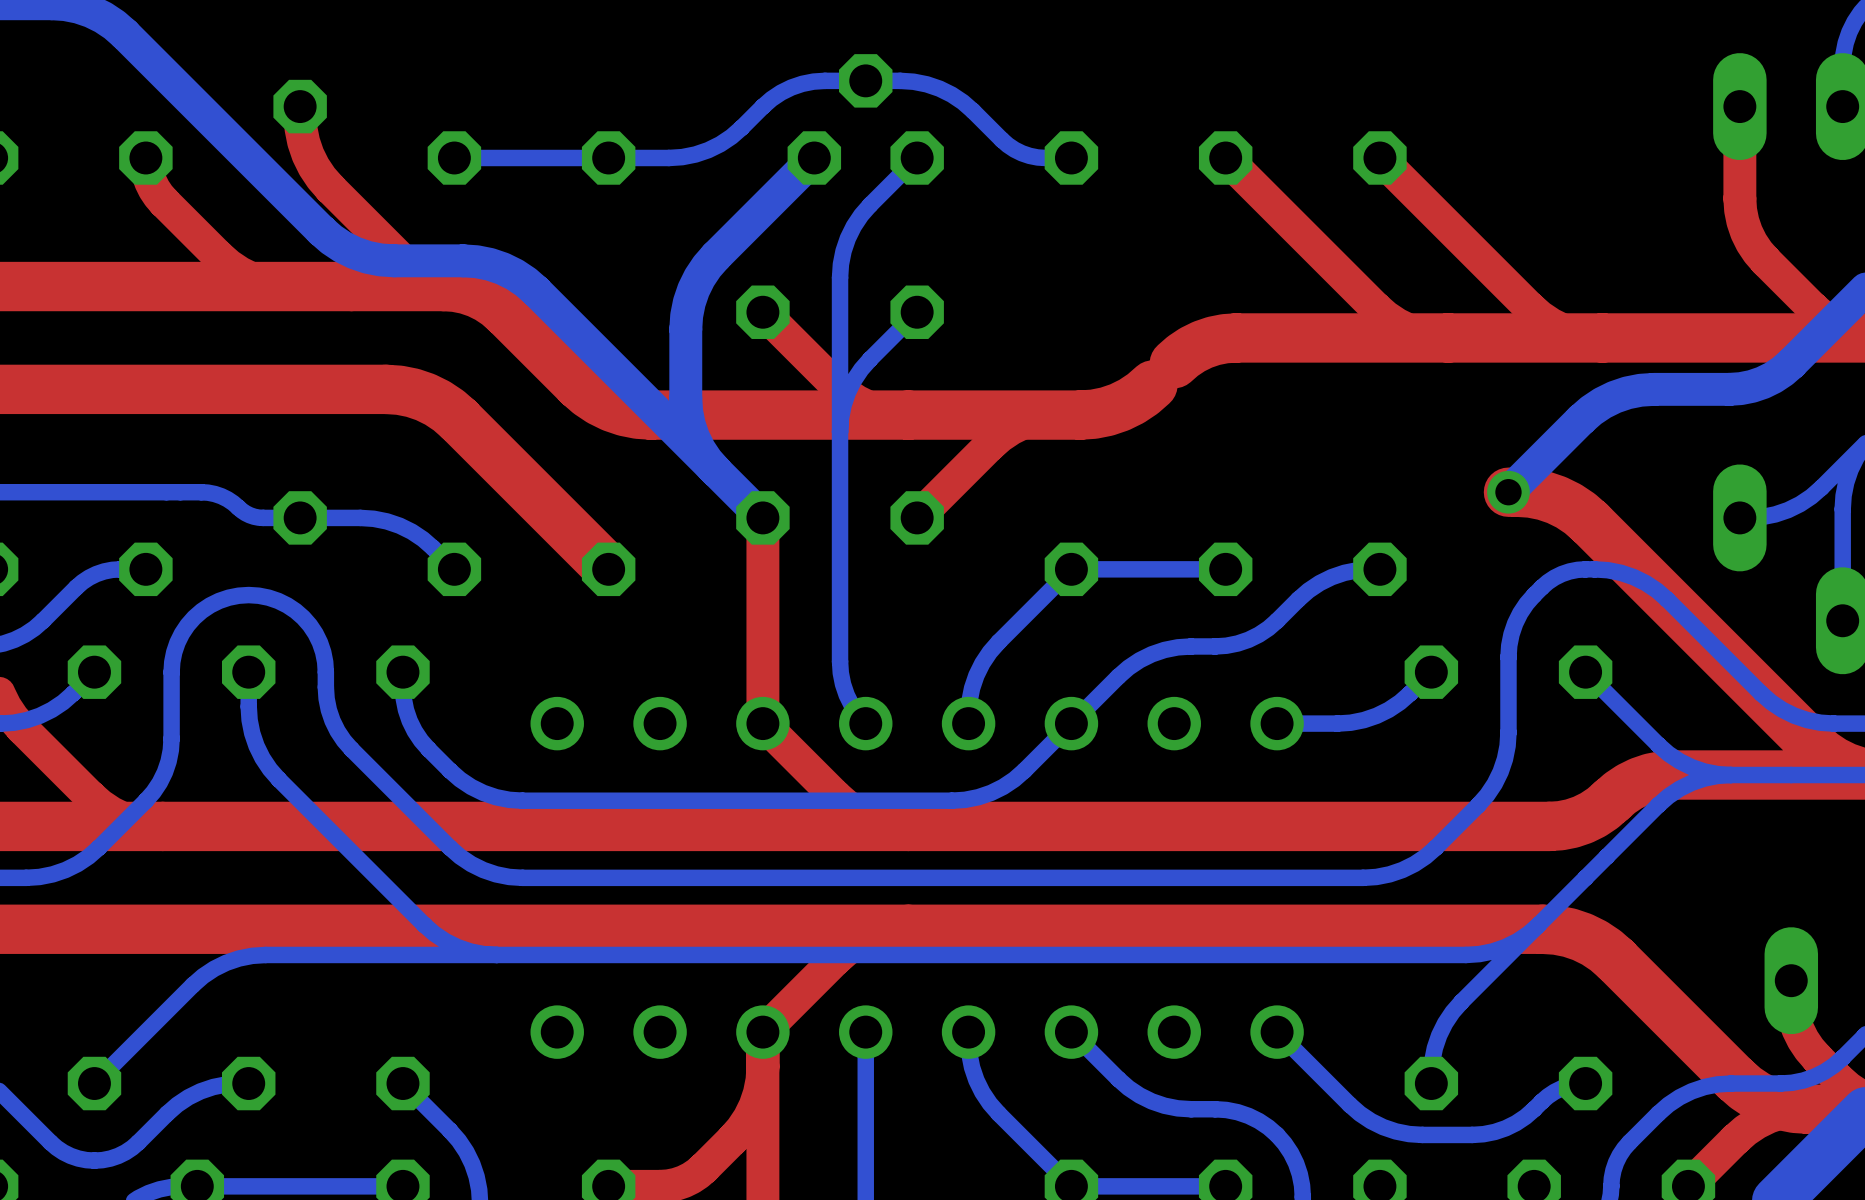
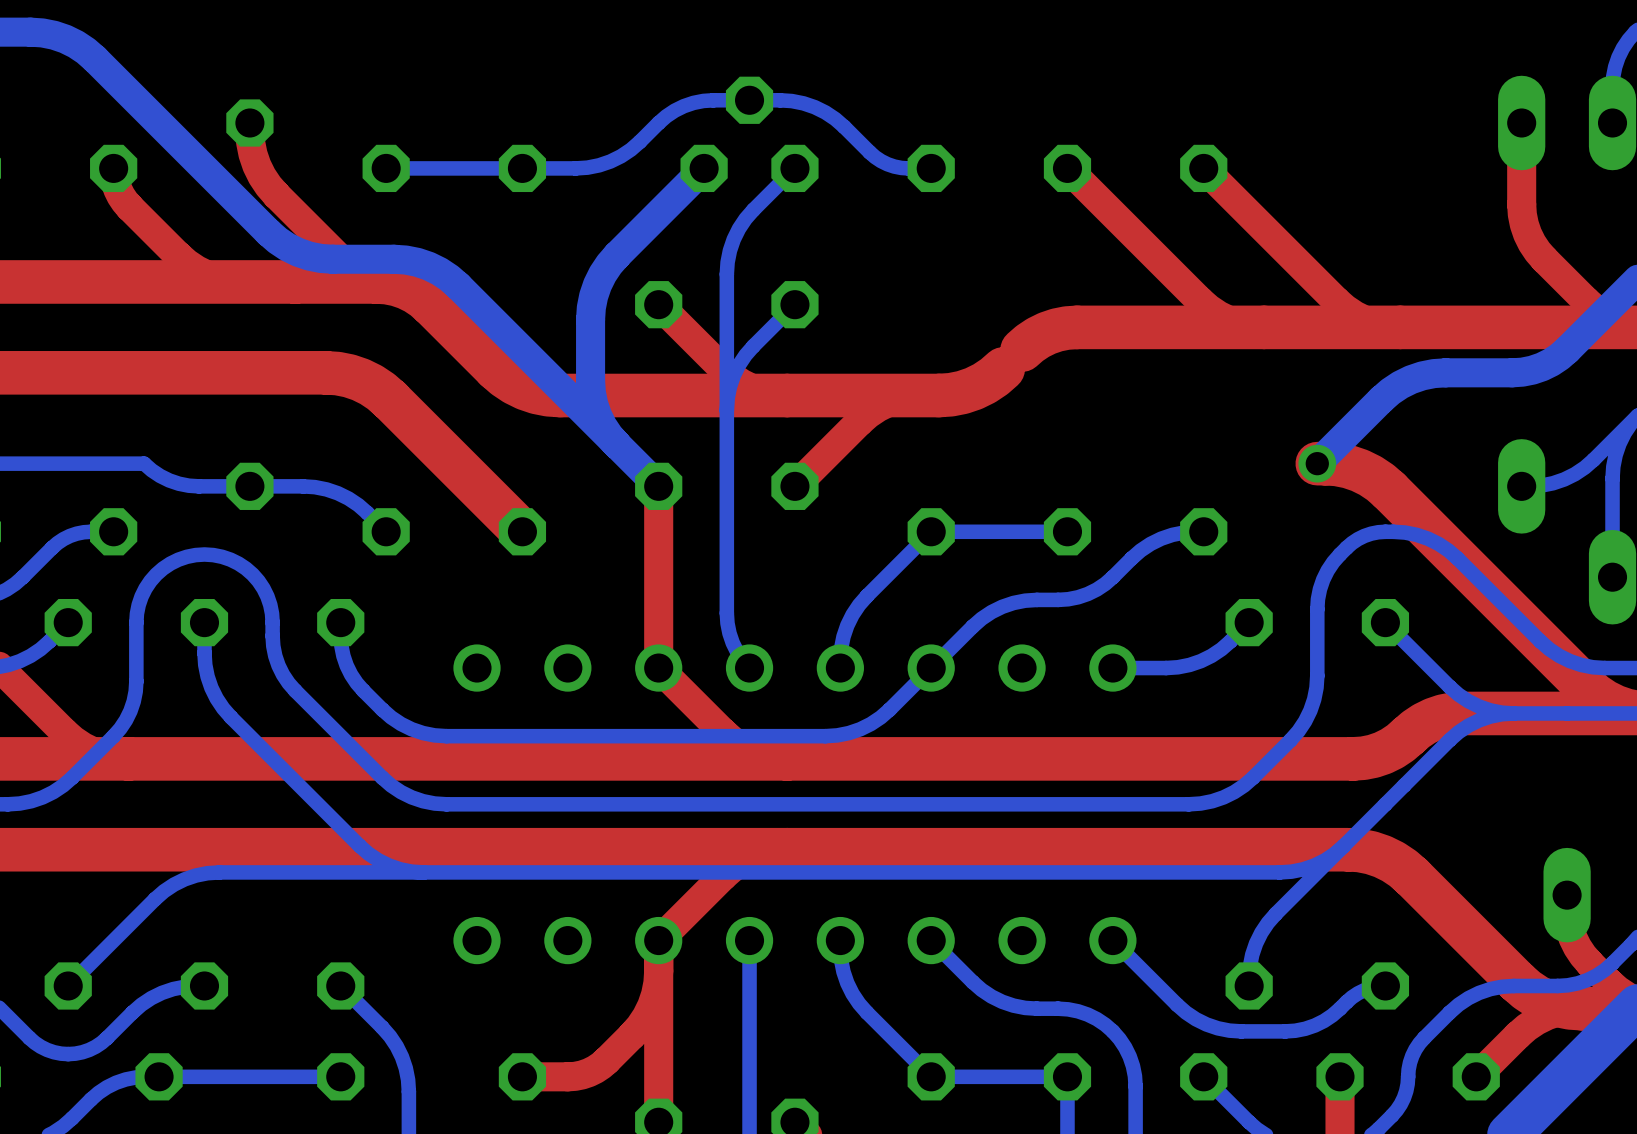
bottom track: (180, 492) (214, 494) (227, 499) (245, 513) (263, 517) -> (144, 463) (160, 475) (178, 483) (217, 486)

